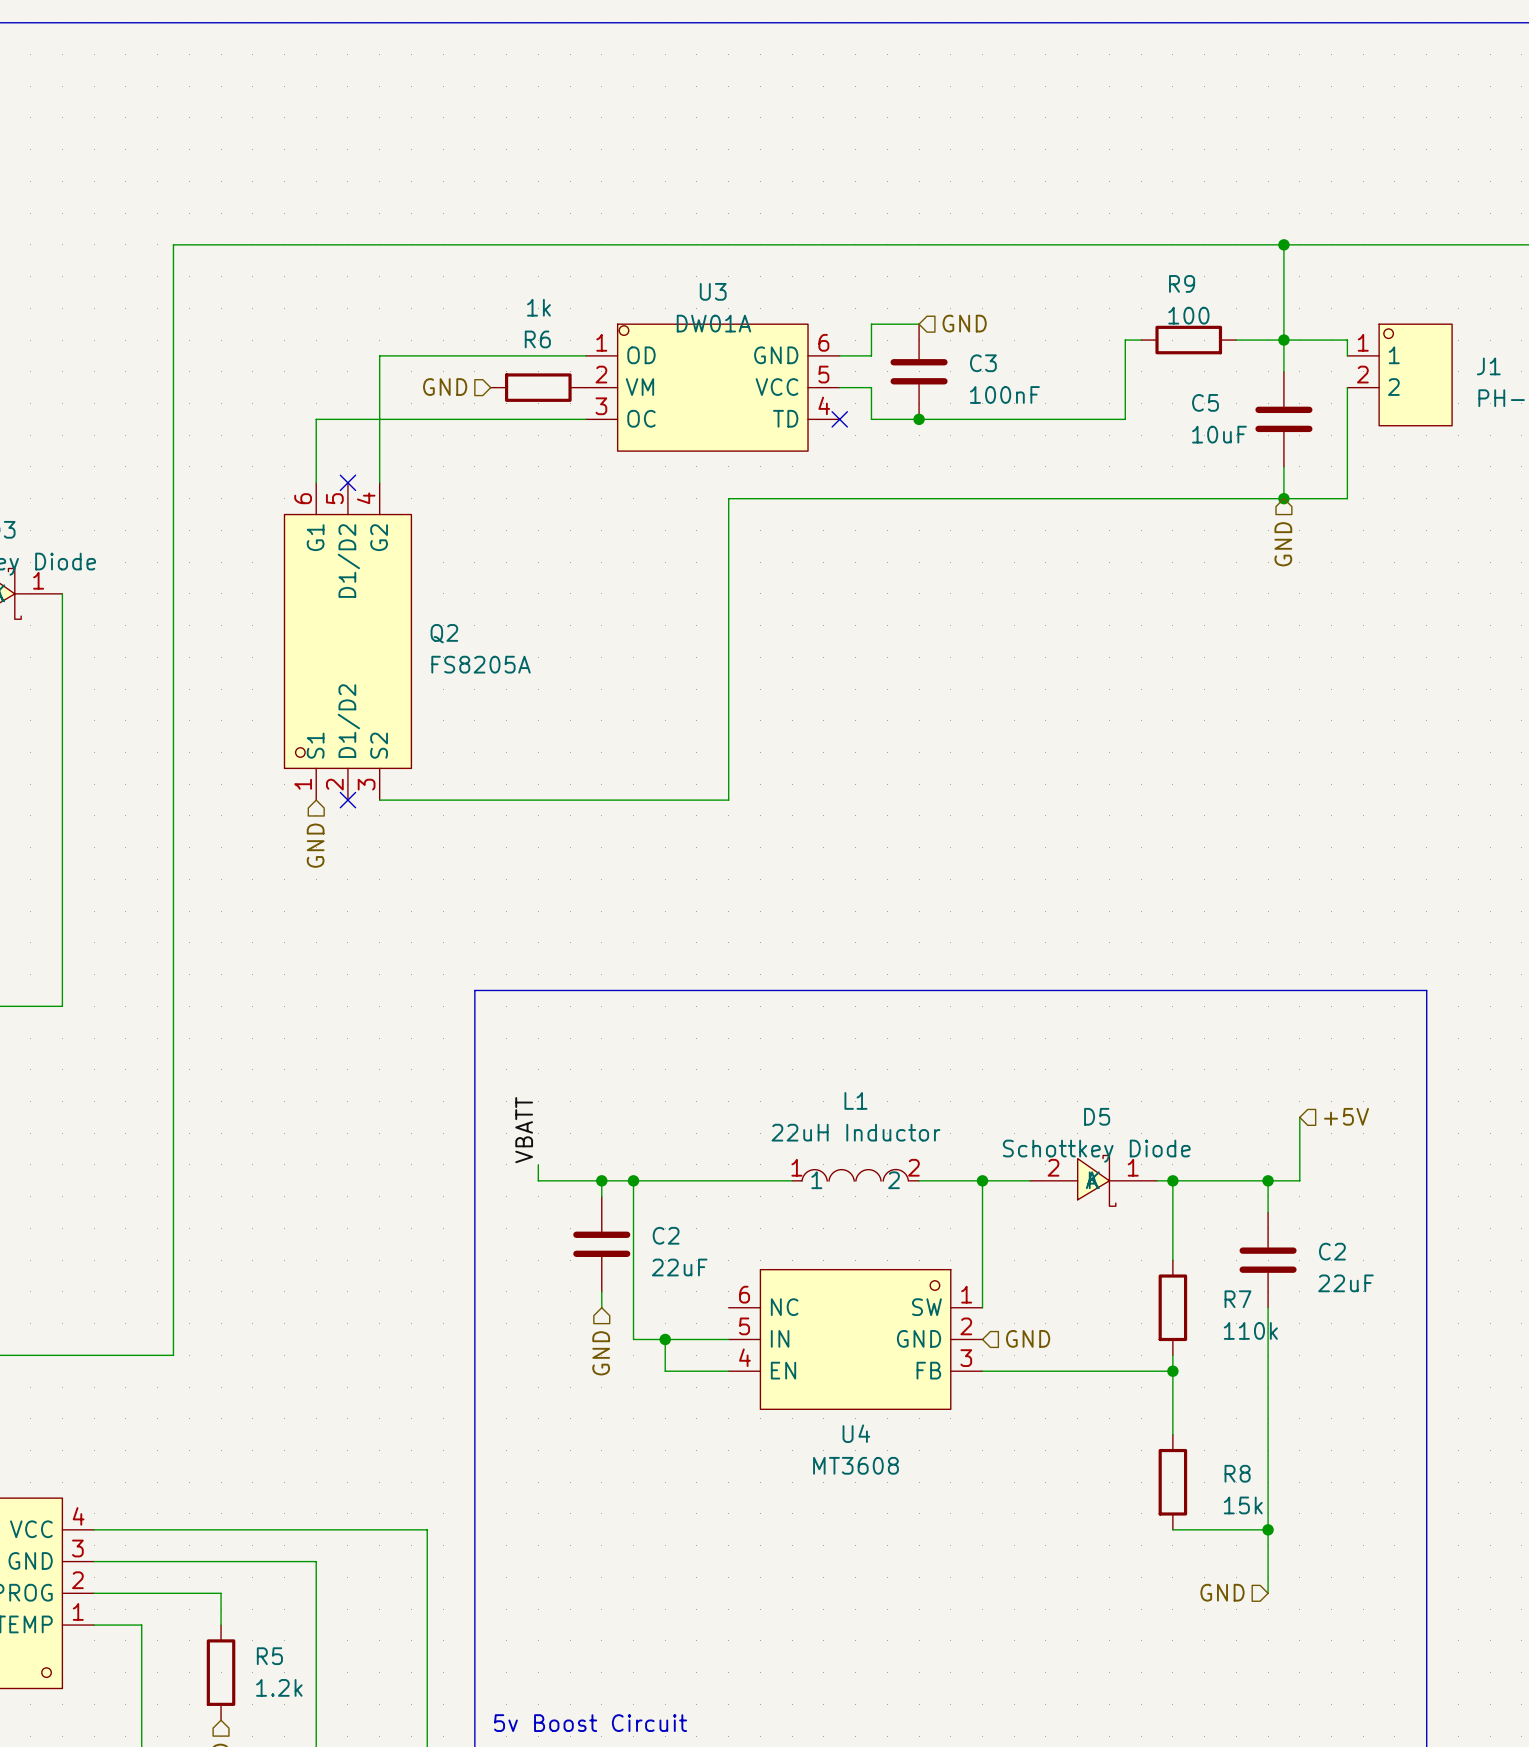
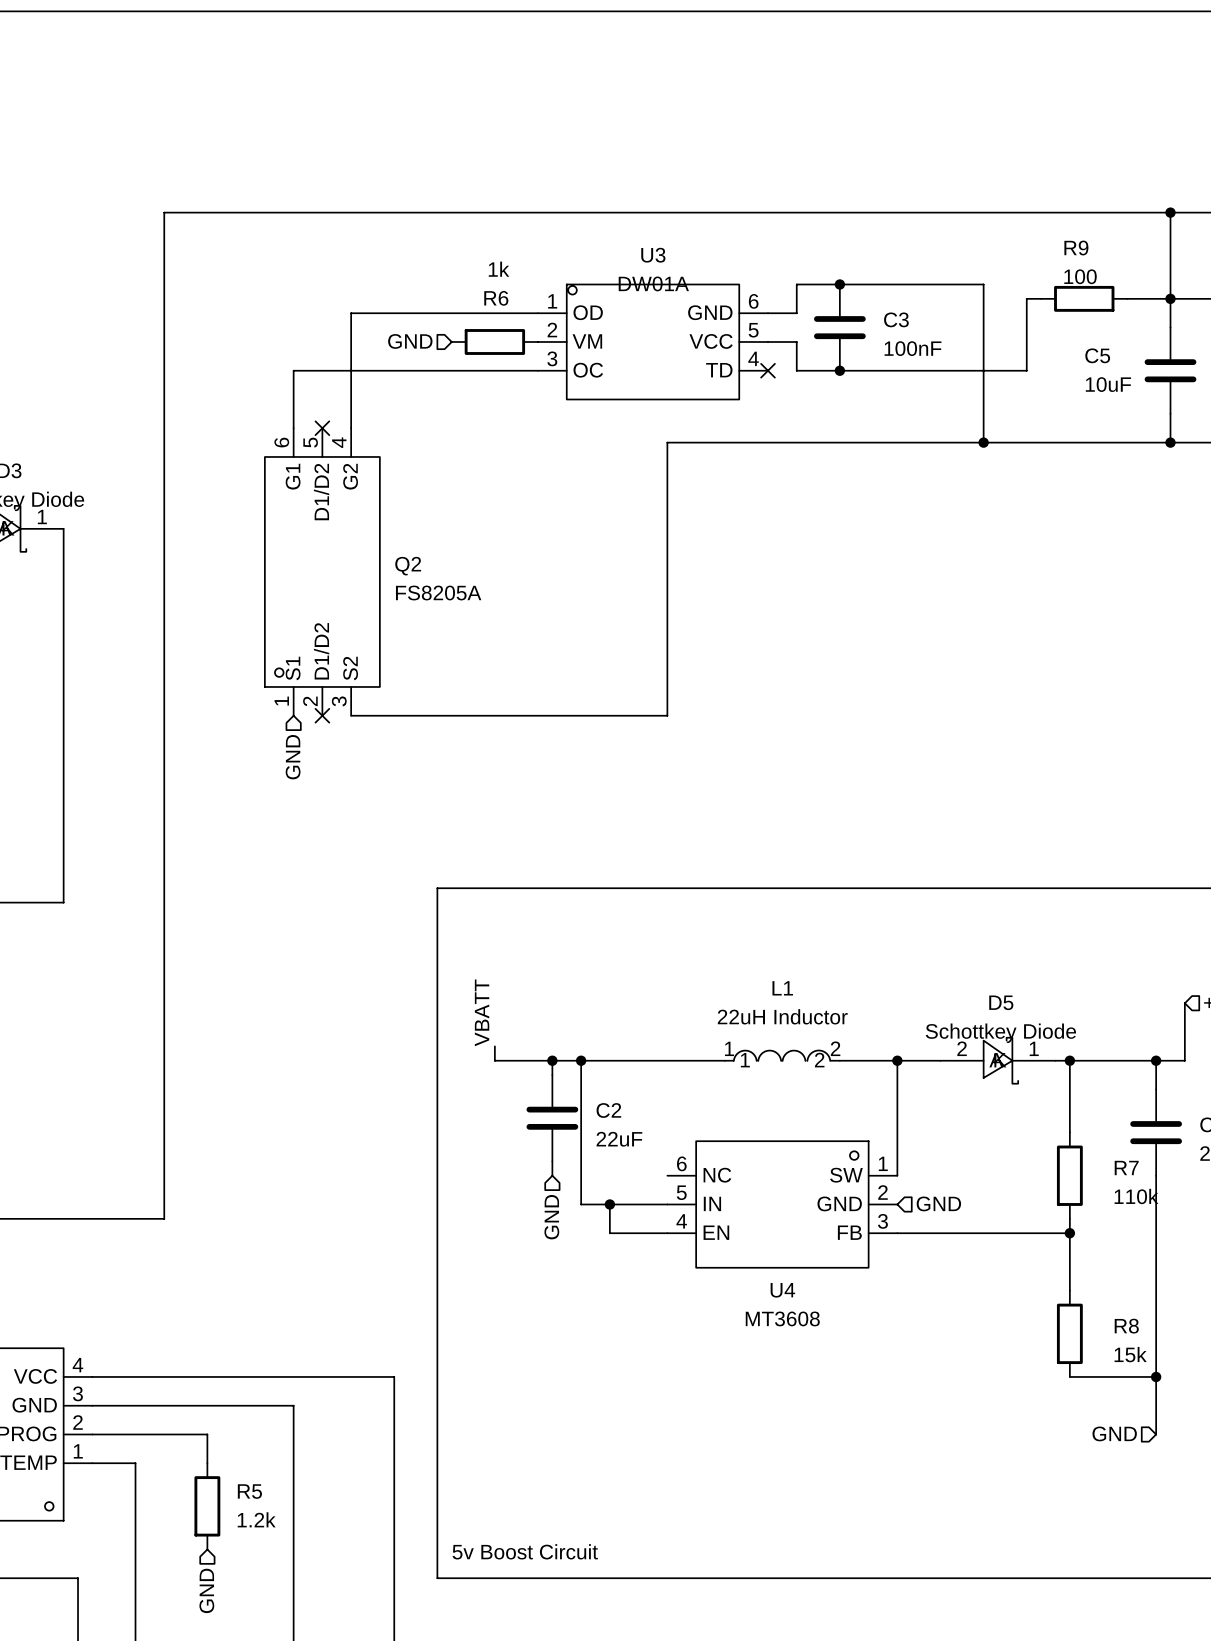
hierarchical label: GND (964, 323) -> none
wire: none -> (839, 284) (983, 284) (983, 442)
junction: none -> (839, 284)
junction: none -> (983, 442)
hierarchical label: GND (1283, 544) -> none

